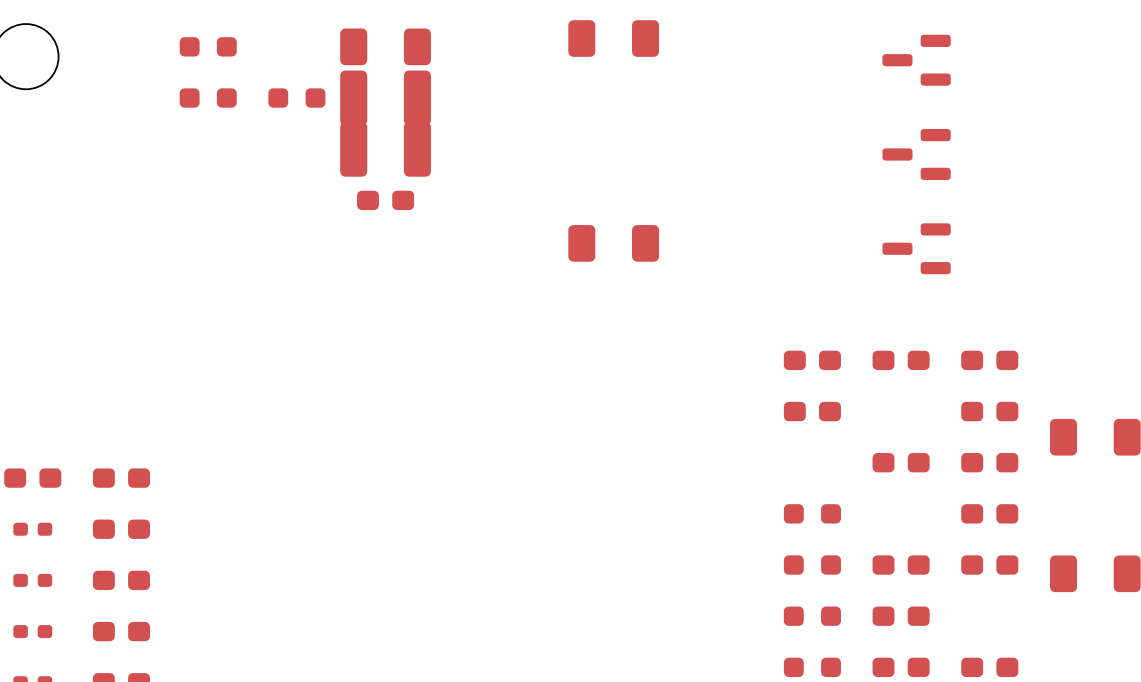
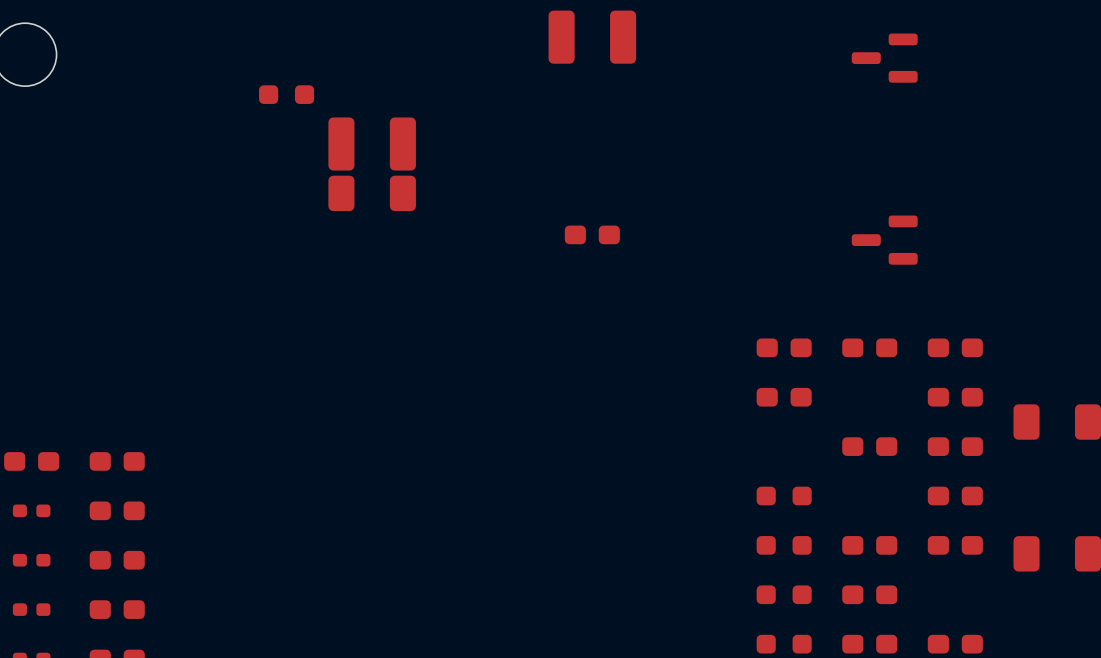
part footprint: [568, 20, 660, 57] -> [548, 10, 637, 64]
part: (208, 46) -> none
part: (385, 46) -> none
part: (208, 98) -> none
part: (385, 98) -> none
part: (916, 154) -> none
part footprint: [357, 190, 415, 211] -> [328, 175, 416, 212]
part footprint: [568, 225, 660, 262] -> [564, 225, 620, 245]

